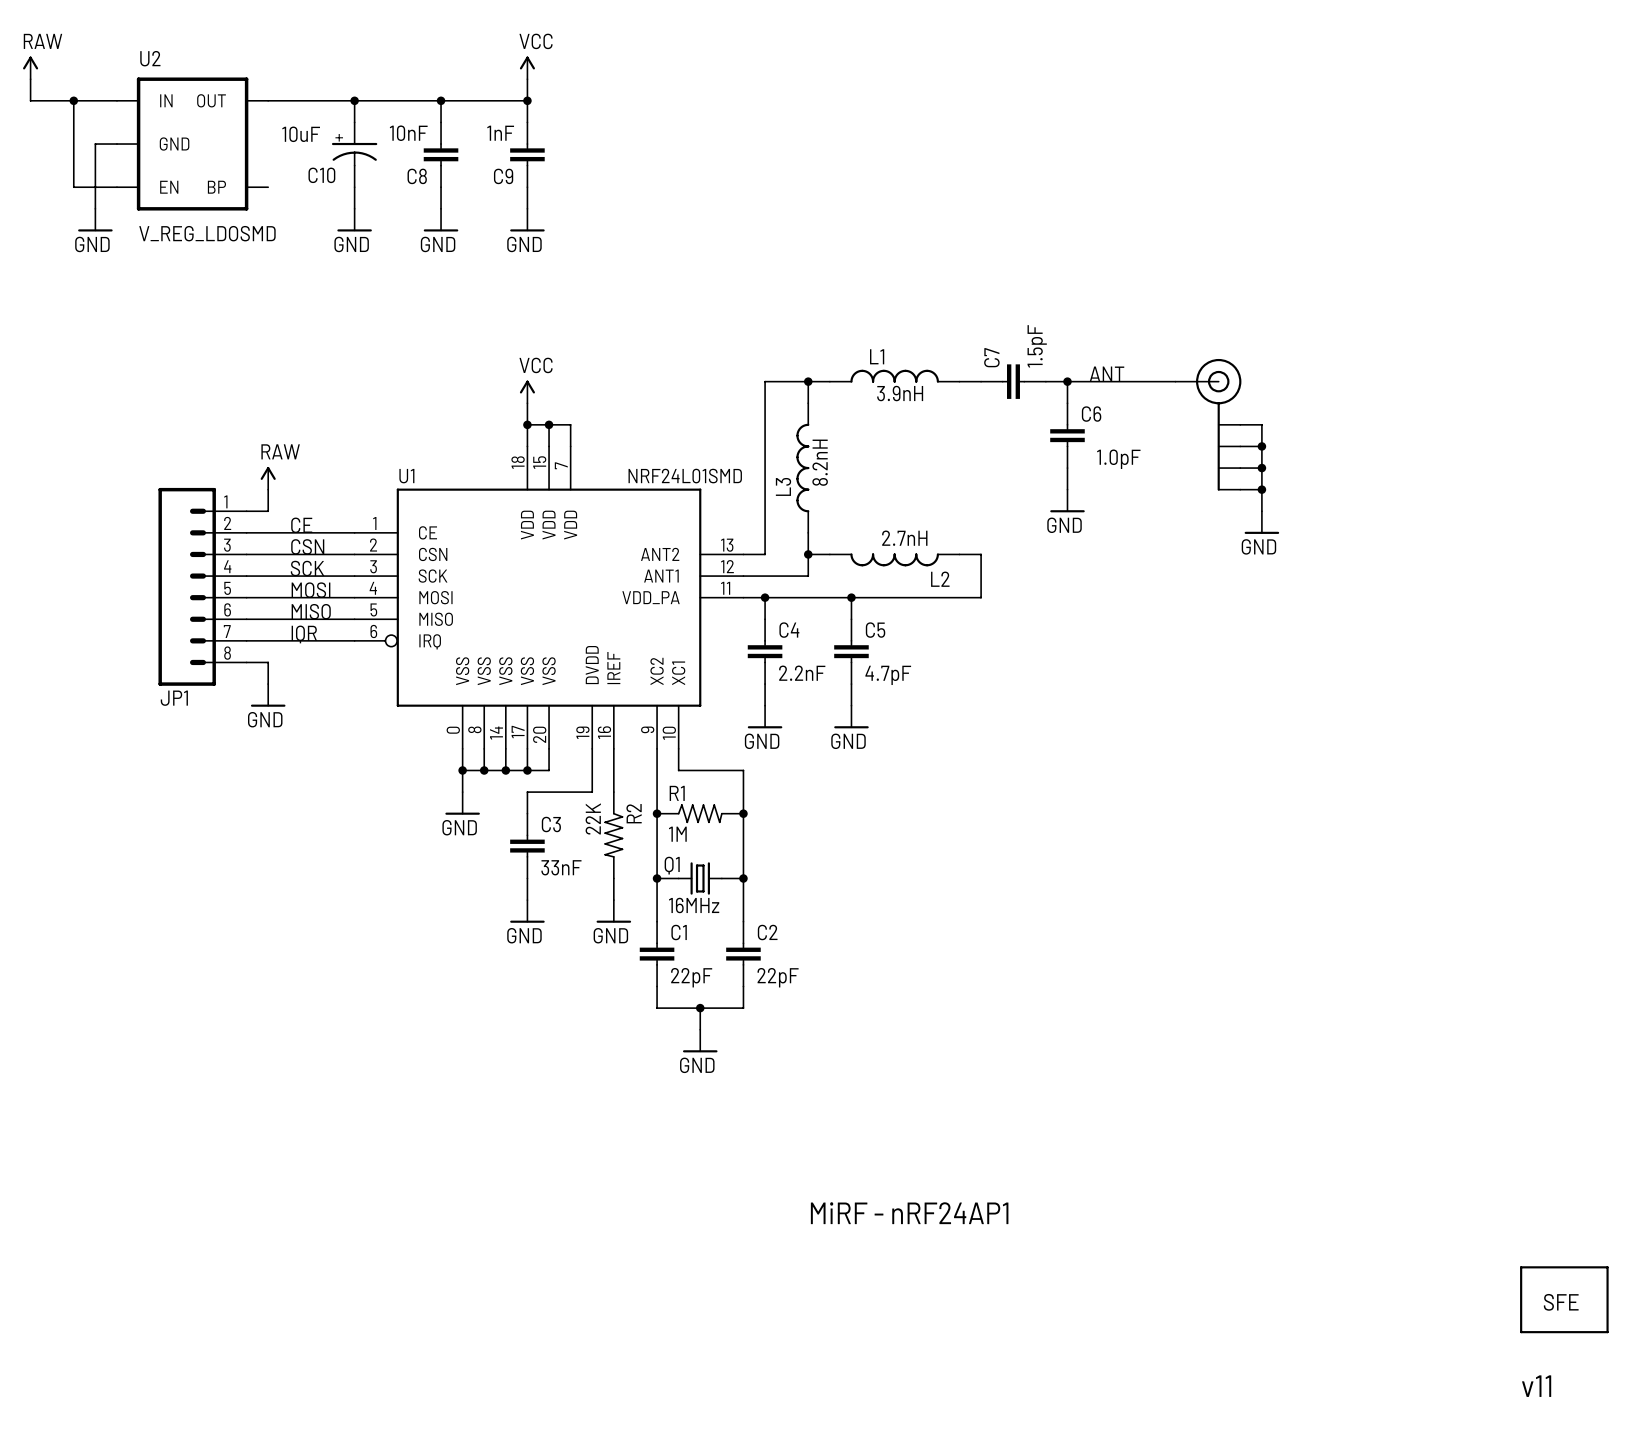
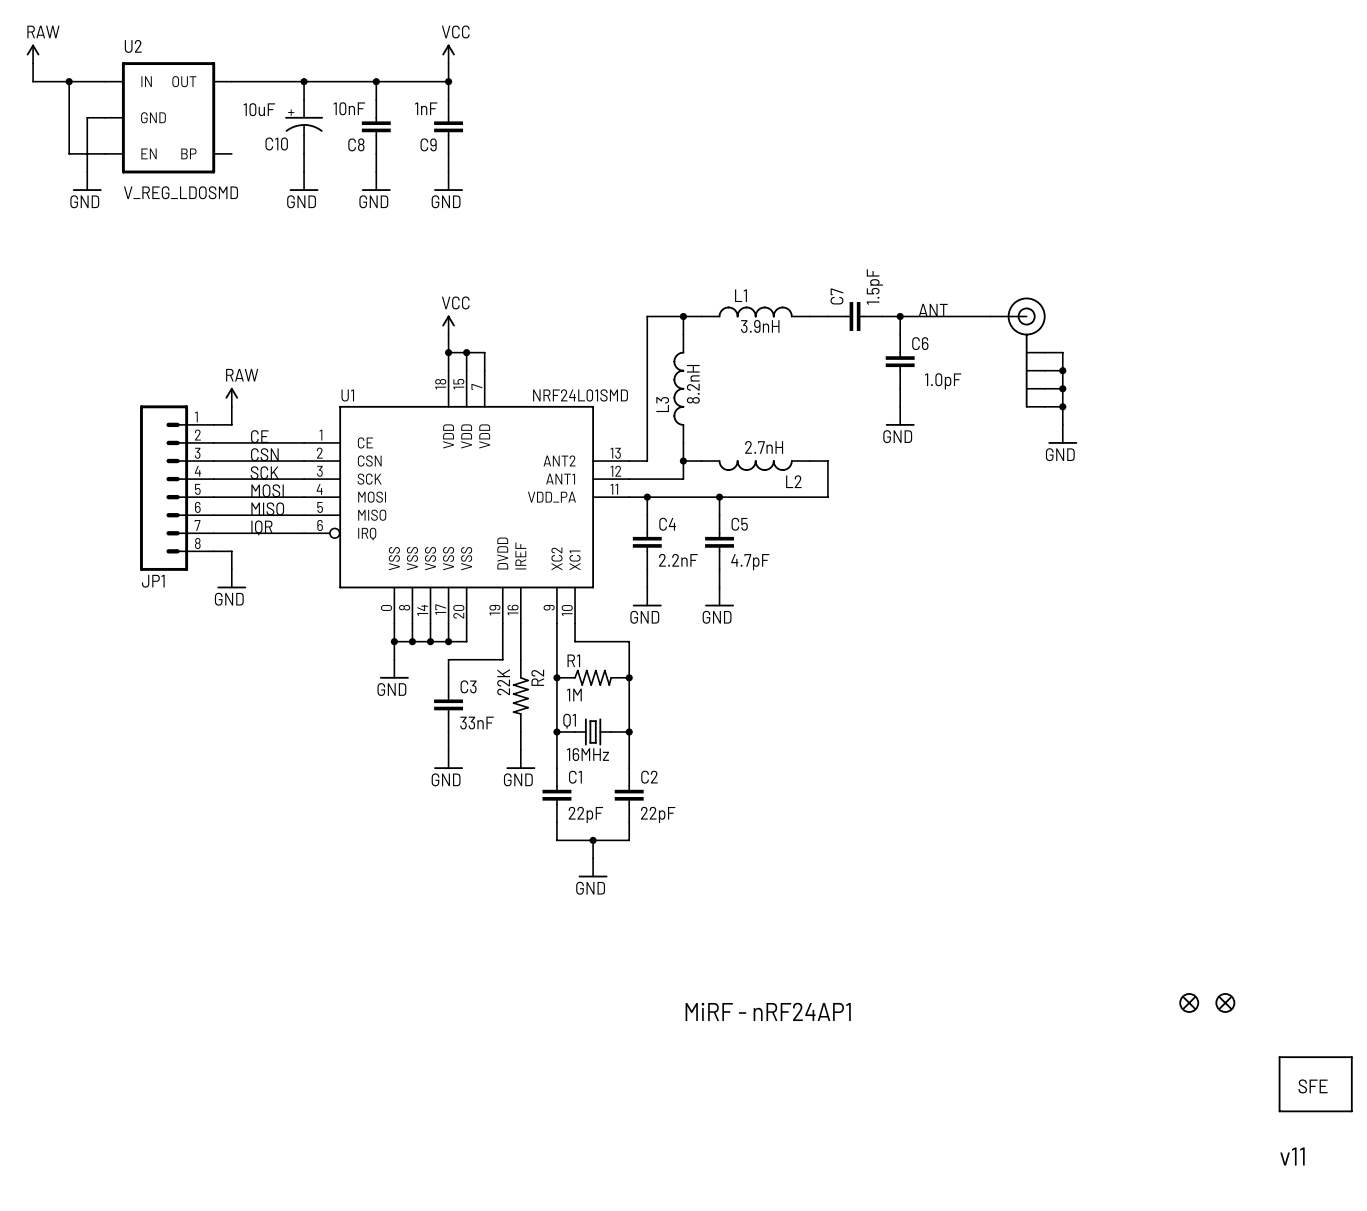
part: none -> (1189, 1002)
part: none -> (1225, 1002)

